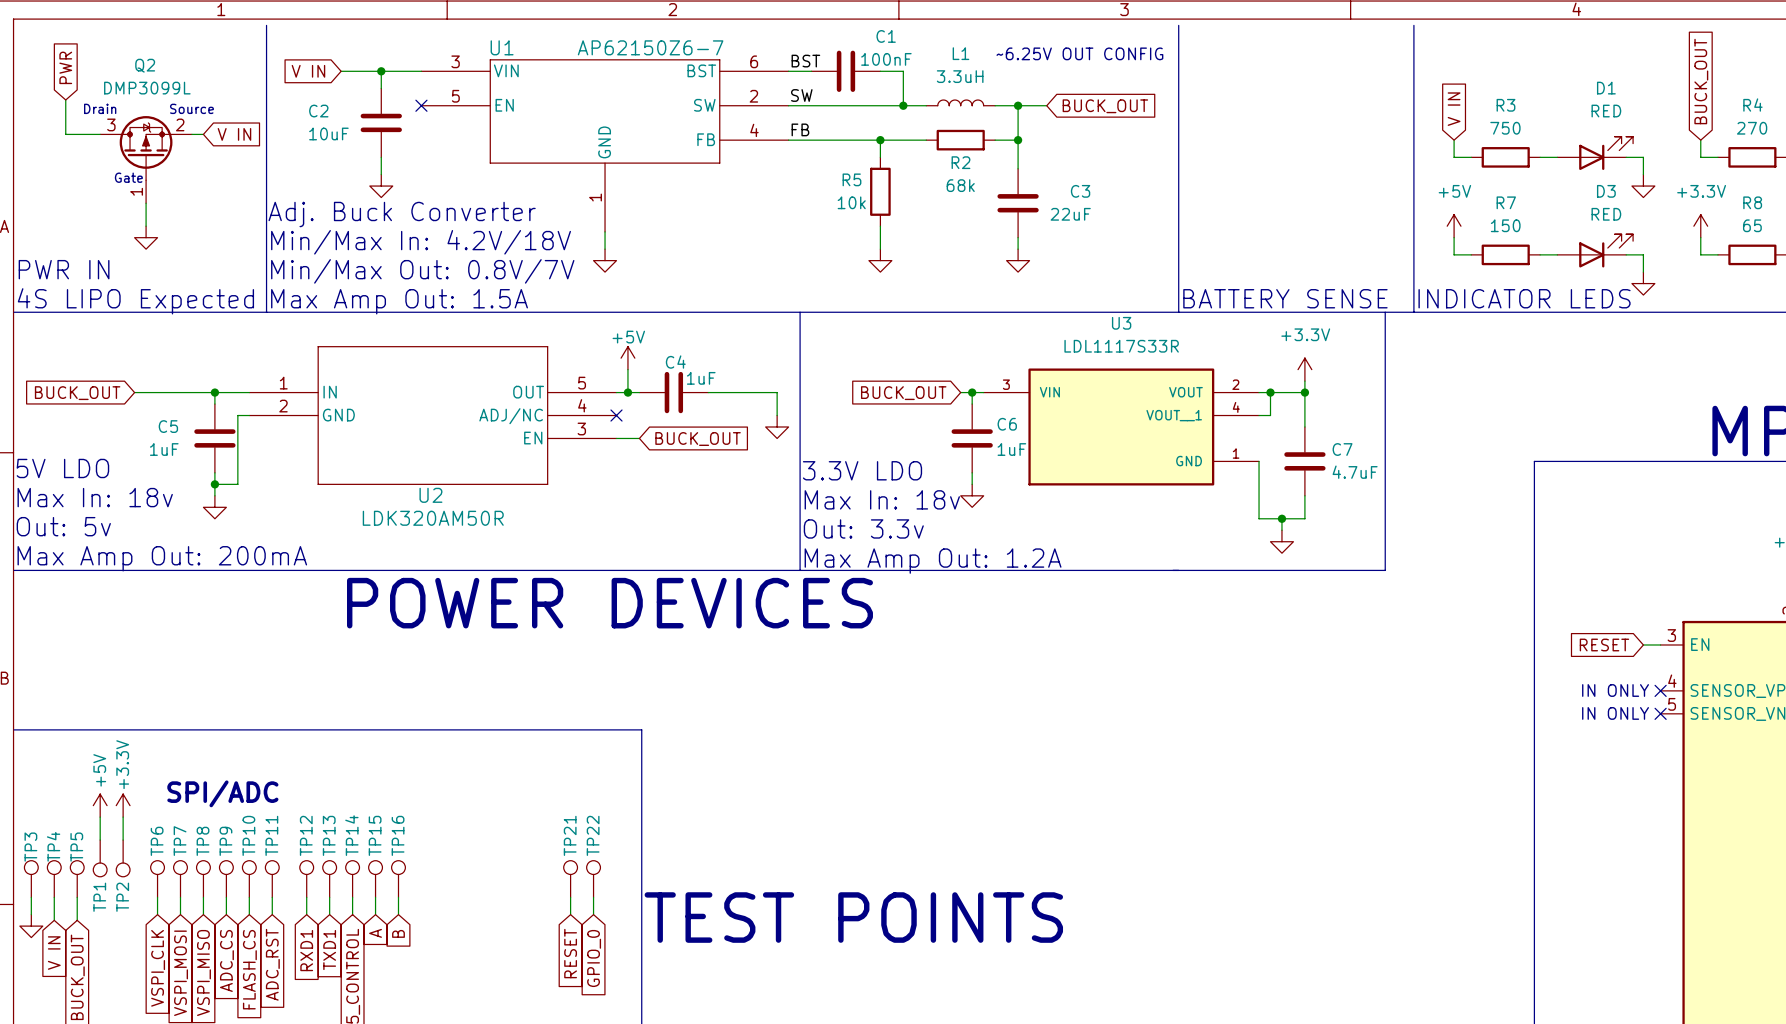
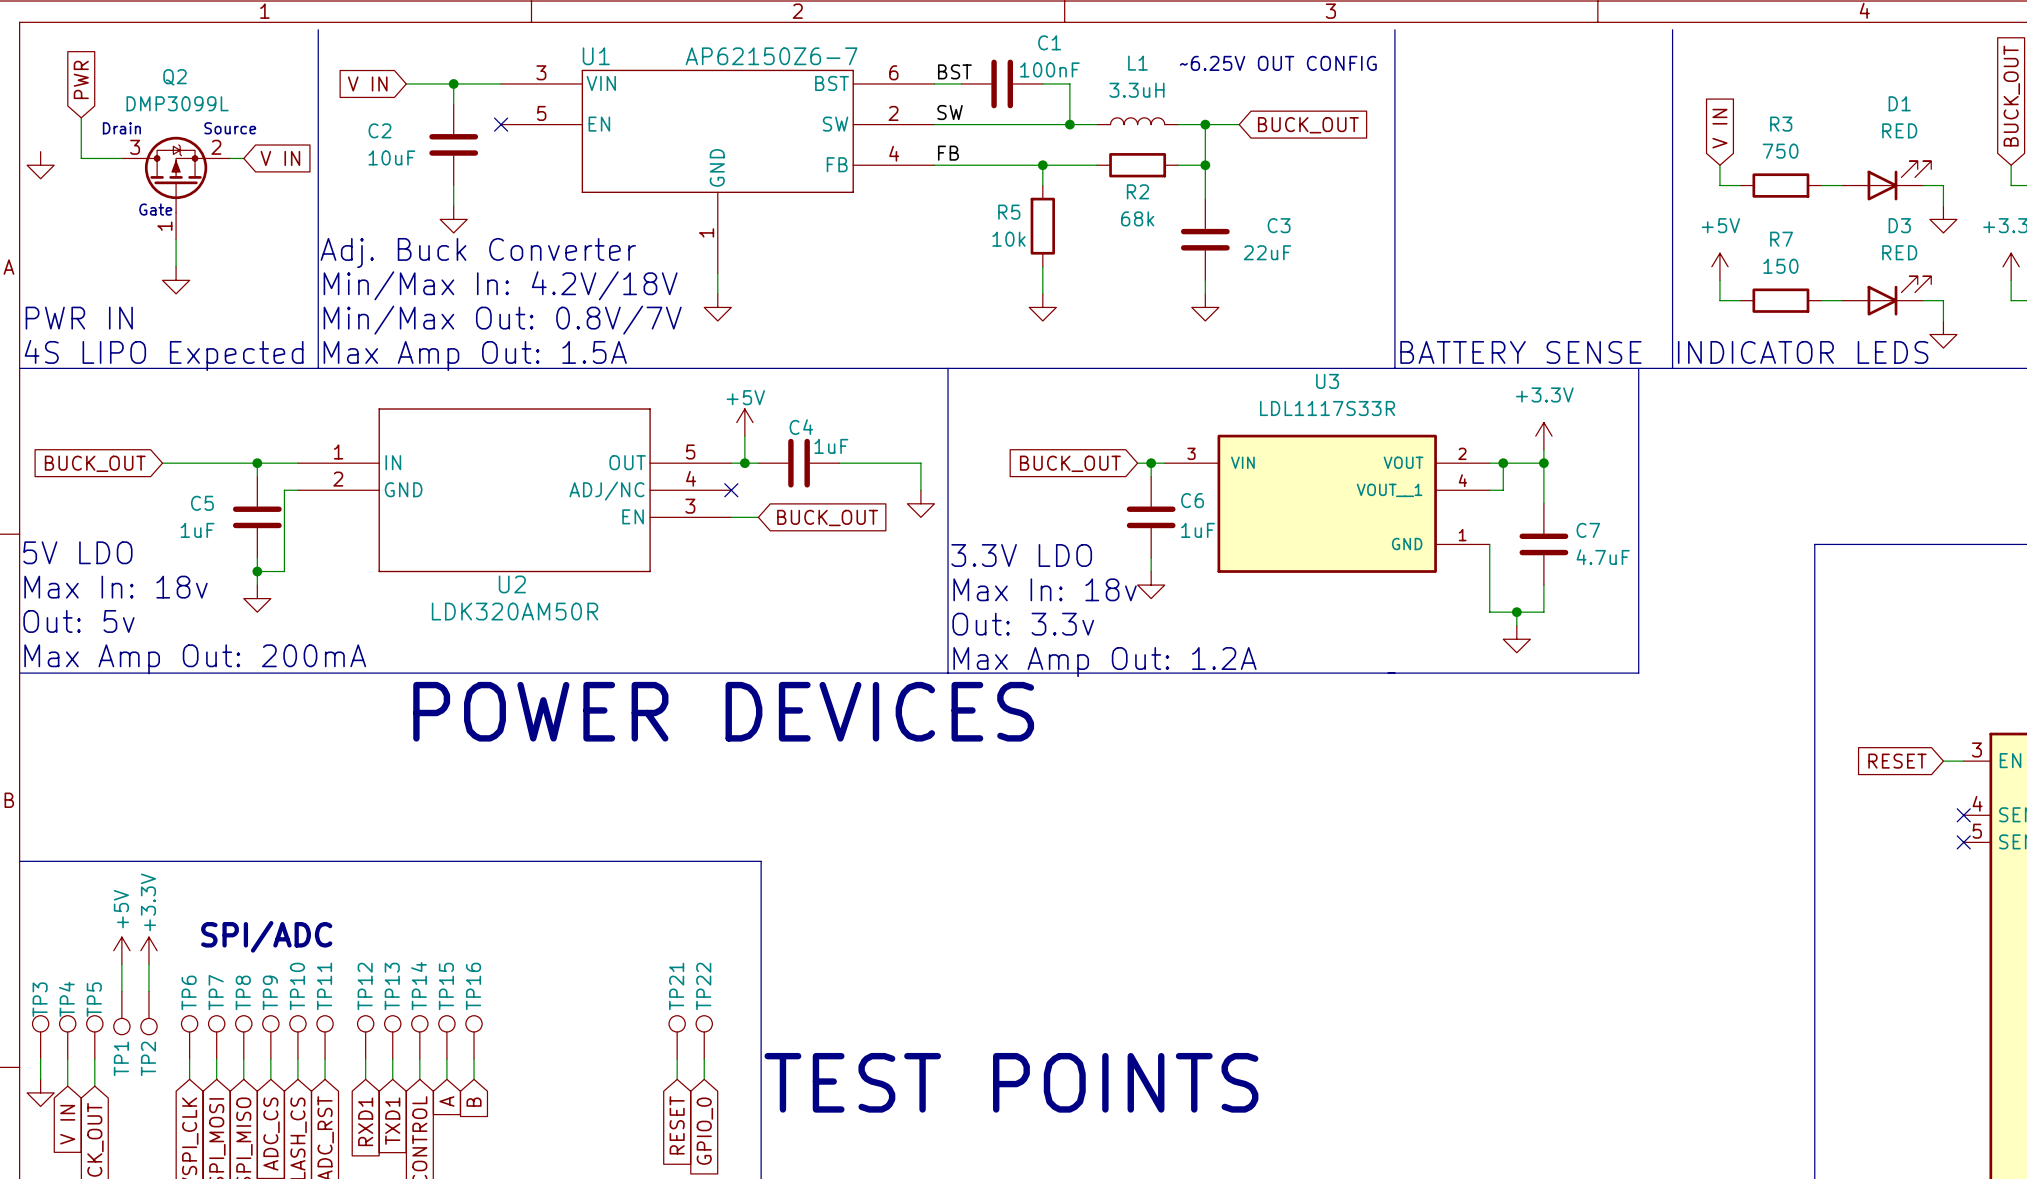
power symbol: none -> (40, 165)
text: IN ONLY (1615, 690) -> none
text: IN ONLY (1615, 713) -> none

